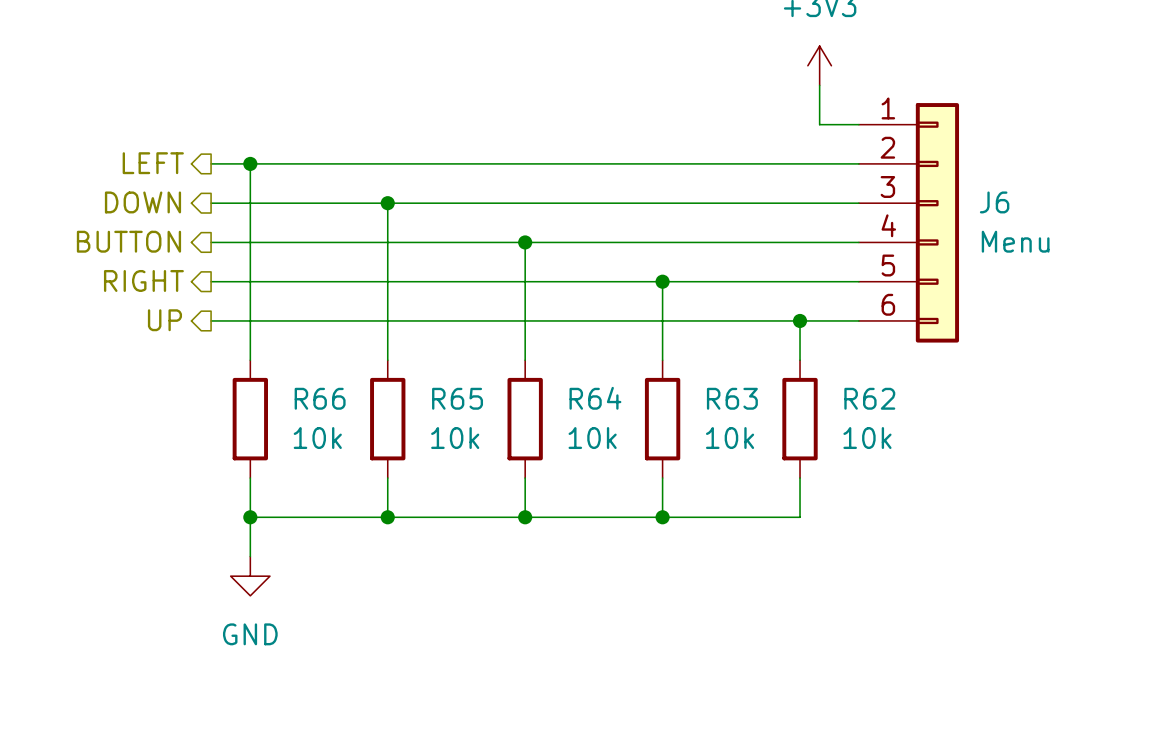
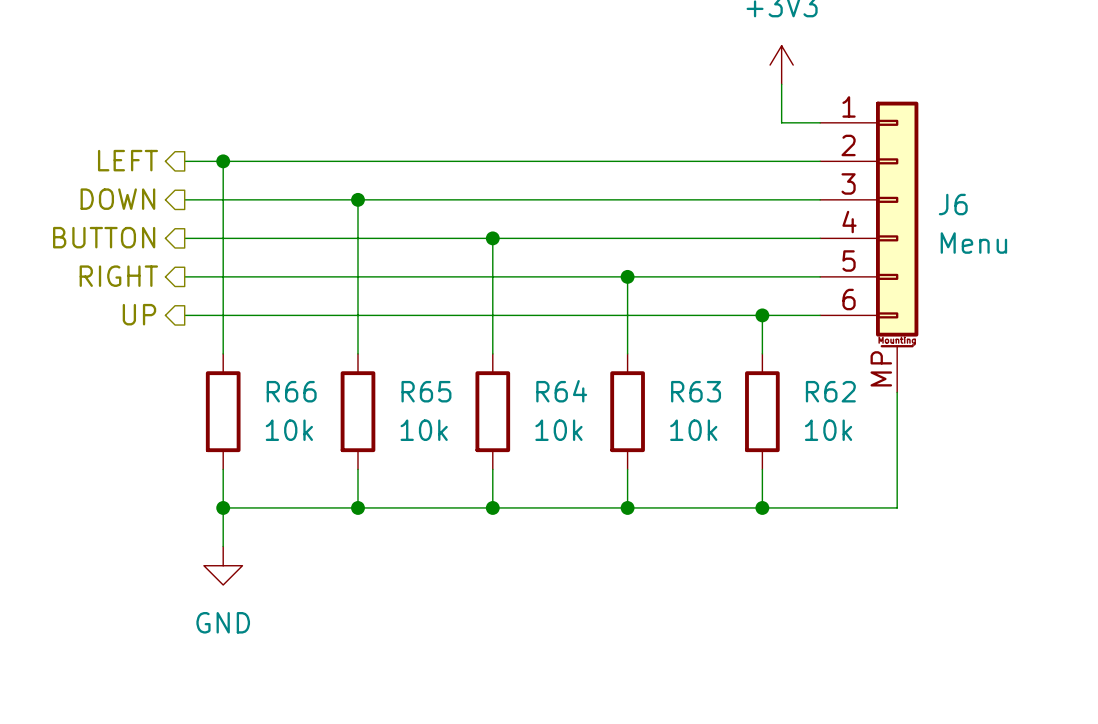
J6 symbol: [858, 103, 960, 343] -> [820, 101, 919, 393]
wire: none -> (897, 392) (897, 507) (762, 507)
junction: none -> (762, 507)

